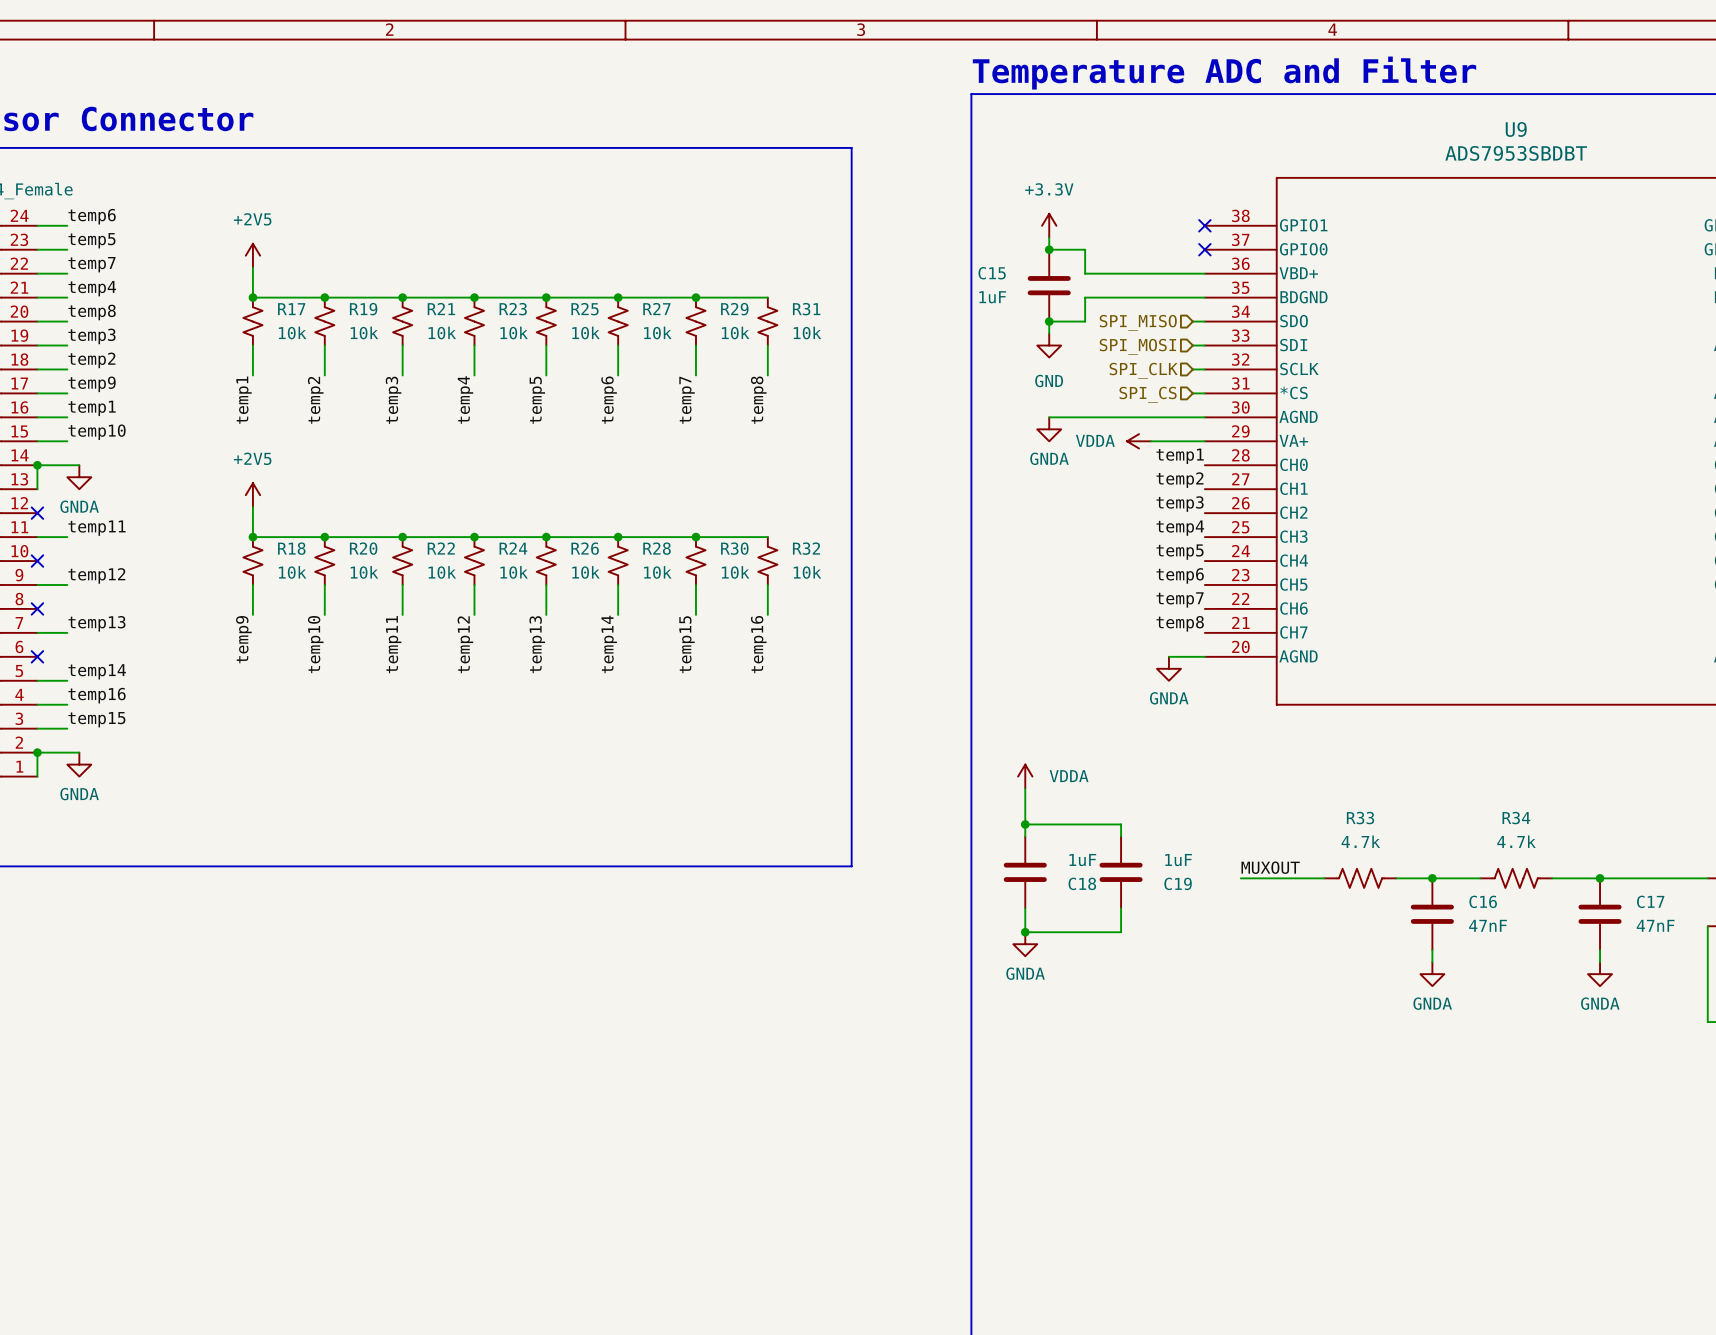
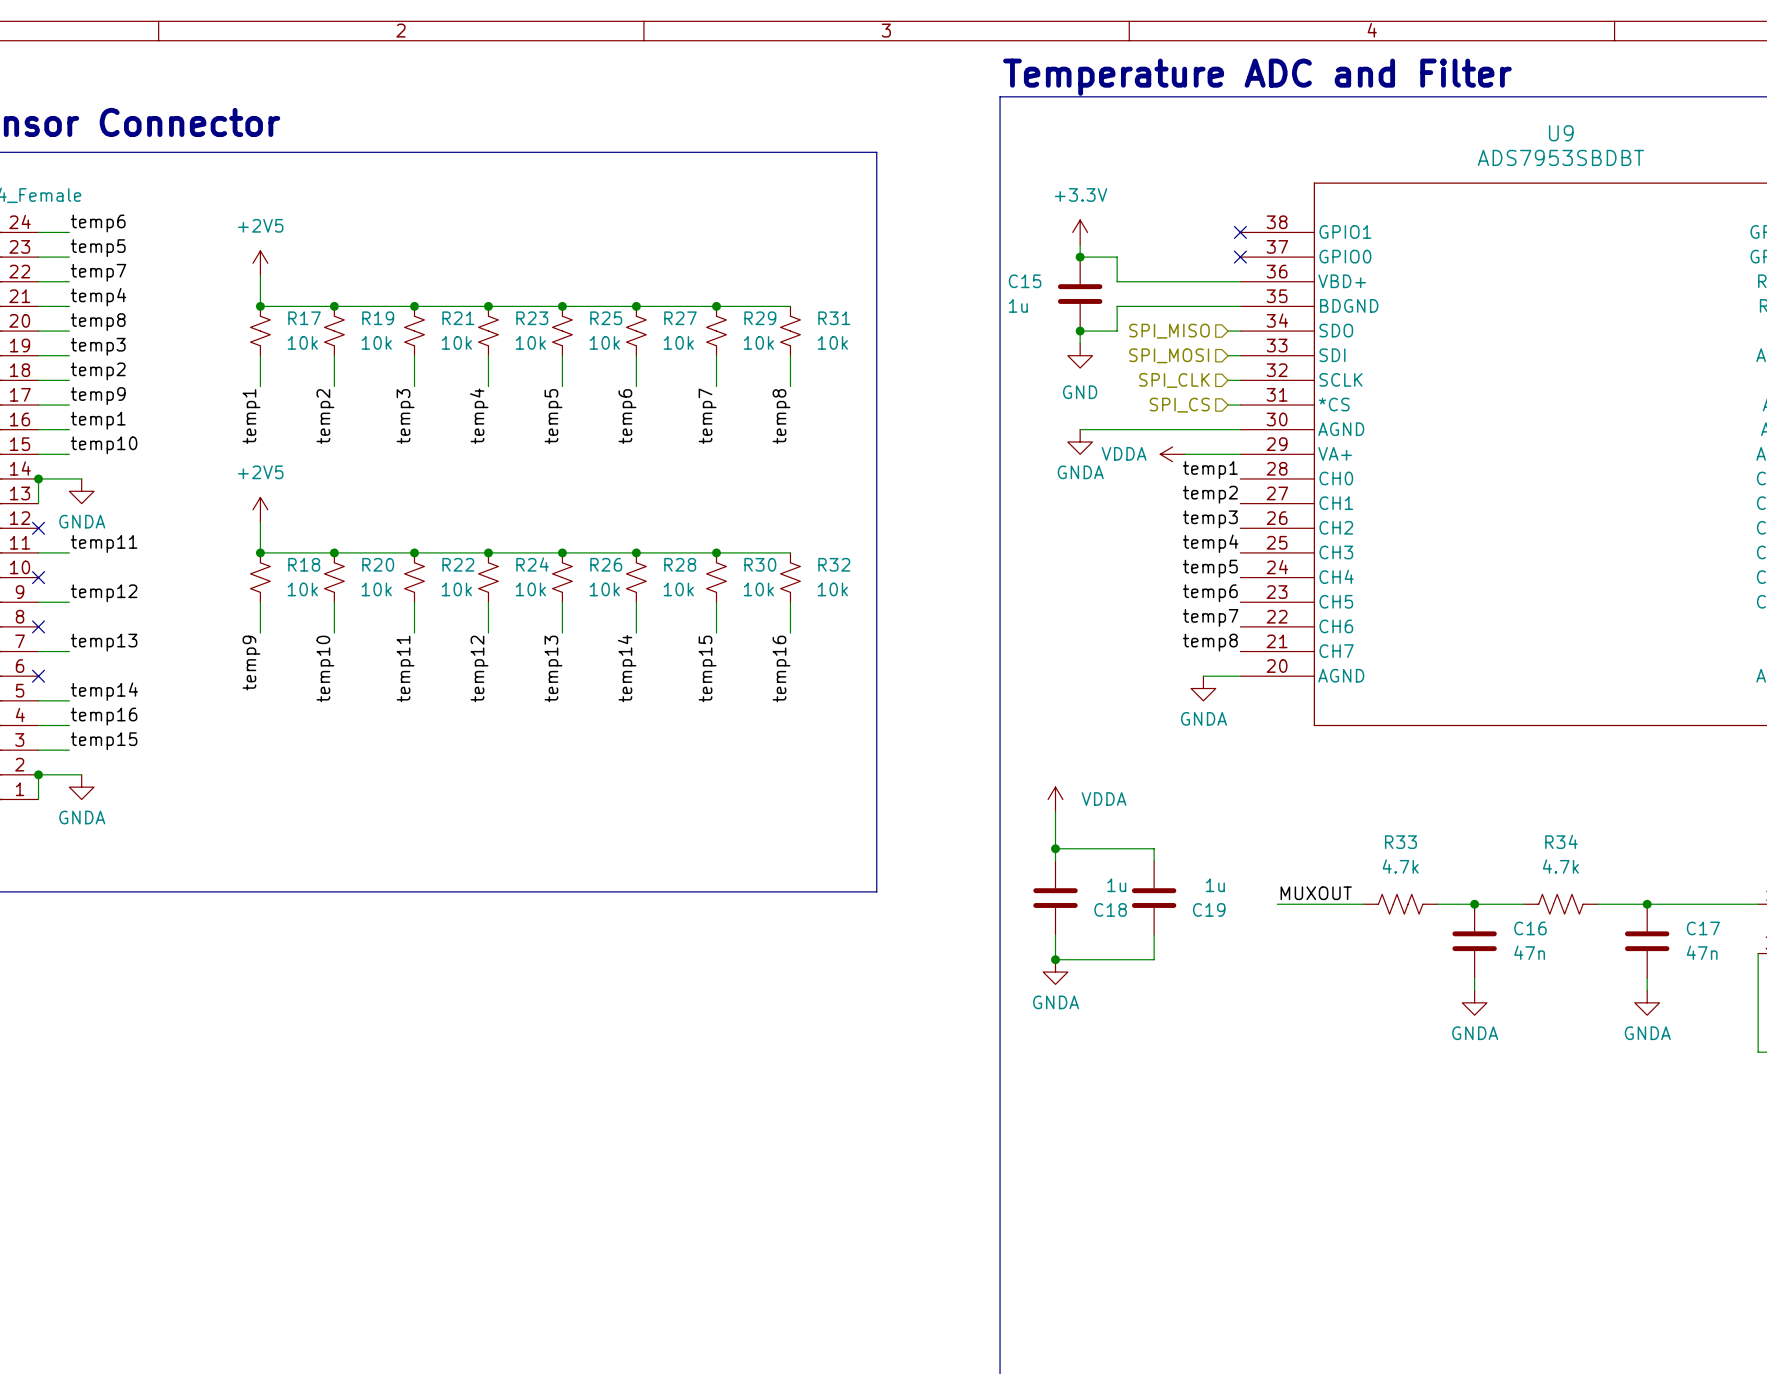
C15 value: 1uF (992, 297) -> 1u (1018, 305)
C18 value: 1uF (1082, 860) -> 1u (1116, 885)
C19 value: 1uF (1178, 860) -> 1u (1215, 885)
C16 value: 47nF (1488, 925) -> 47n (1529, 952)
C17 value: 47nF (1655, 925) -> 47n (1702, 952)

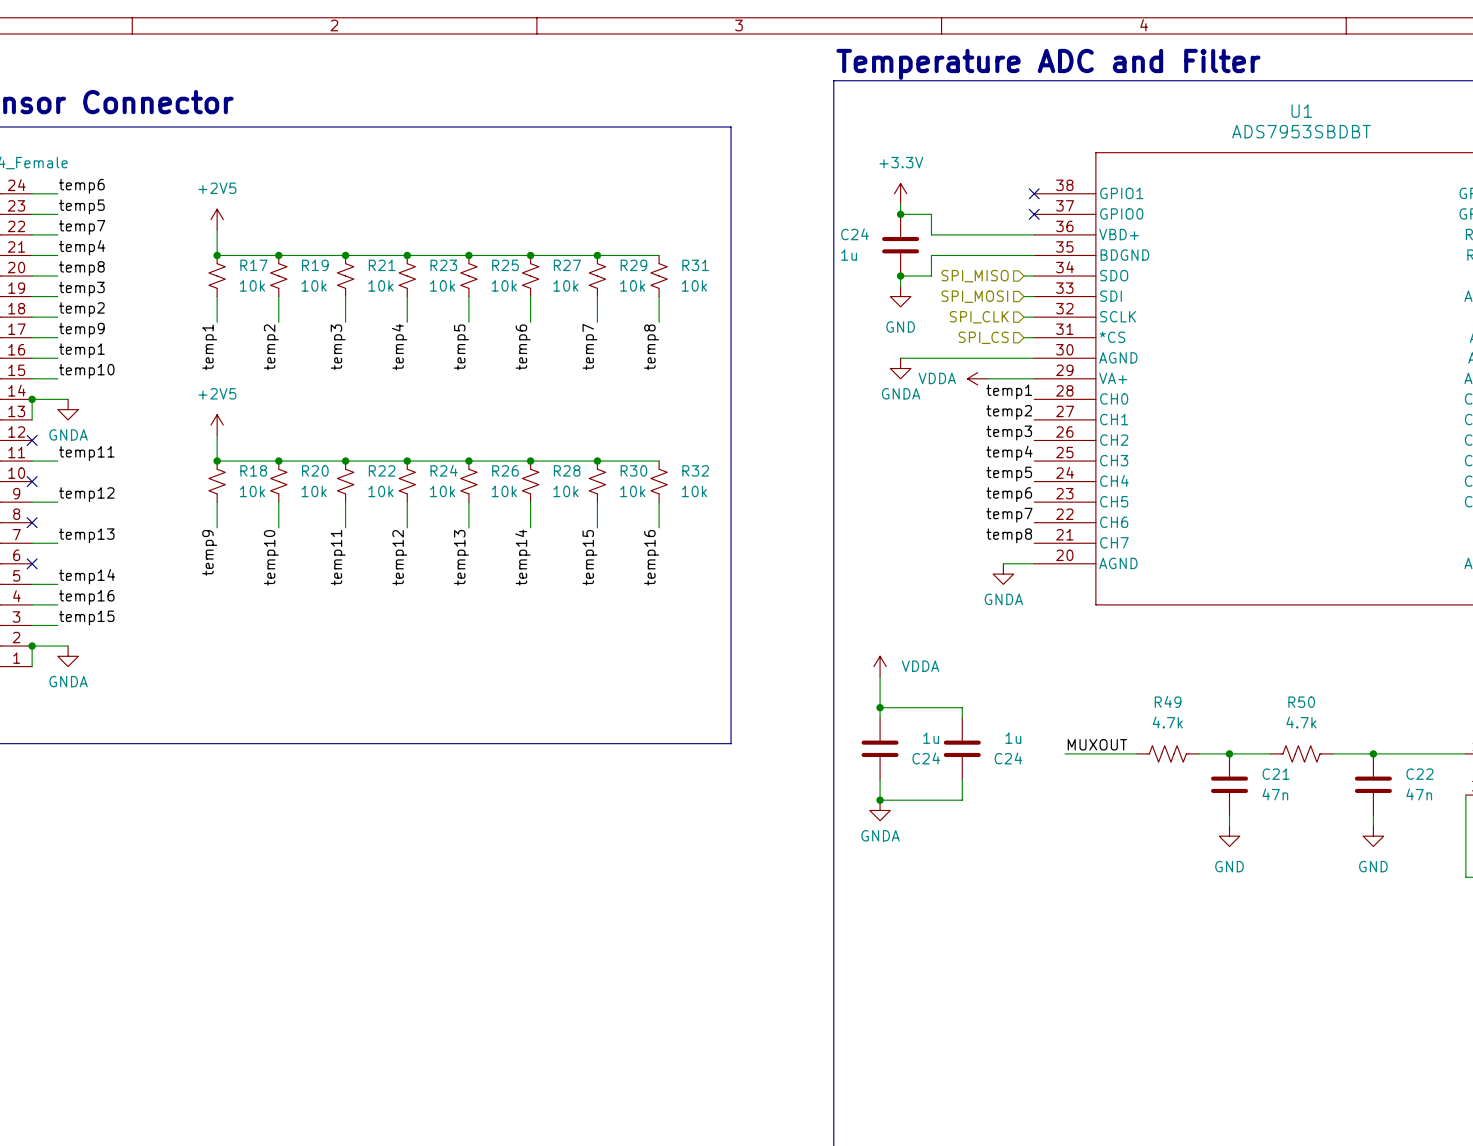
U9 name: U9 (1561, 133) -> U1 (1301, 111)
C15 name: C15 (1025, 281) -> C24 (854, 234)
R34 name: R34 (1561, 841) -> R50 (1301, 702)
R33 name: R33 (1400, 842) -> R49 (1168, 701)
C18 name: C18 (1110, 909) -> C24 (926, 758)
C19 name: C19 (1209, 909) -> C24 (1008, 758)
C16 name: C16 (1530, 928) -> C21 (1276, 774)
C17 name: C17 (1703, 928) -> C22 (1419, 774)
power symbol: GNDA (1474, 1002) -> GND (1229, 836)
power symbol: GNDA (1647, 1002) -> GND (1373, 836)

